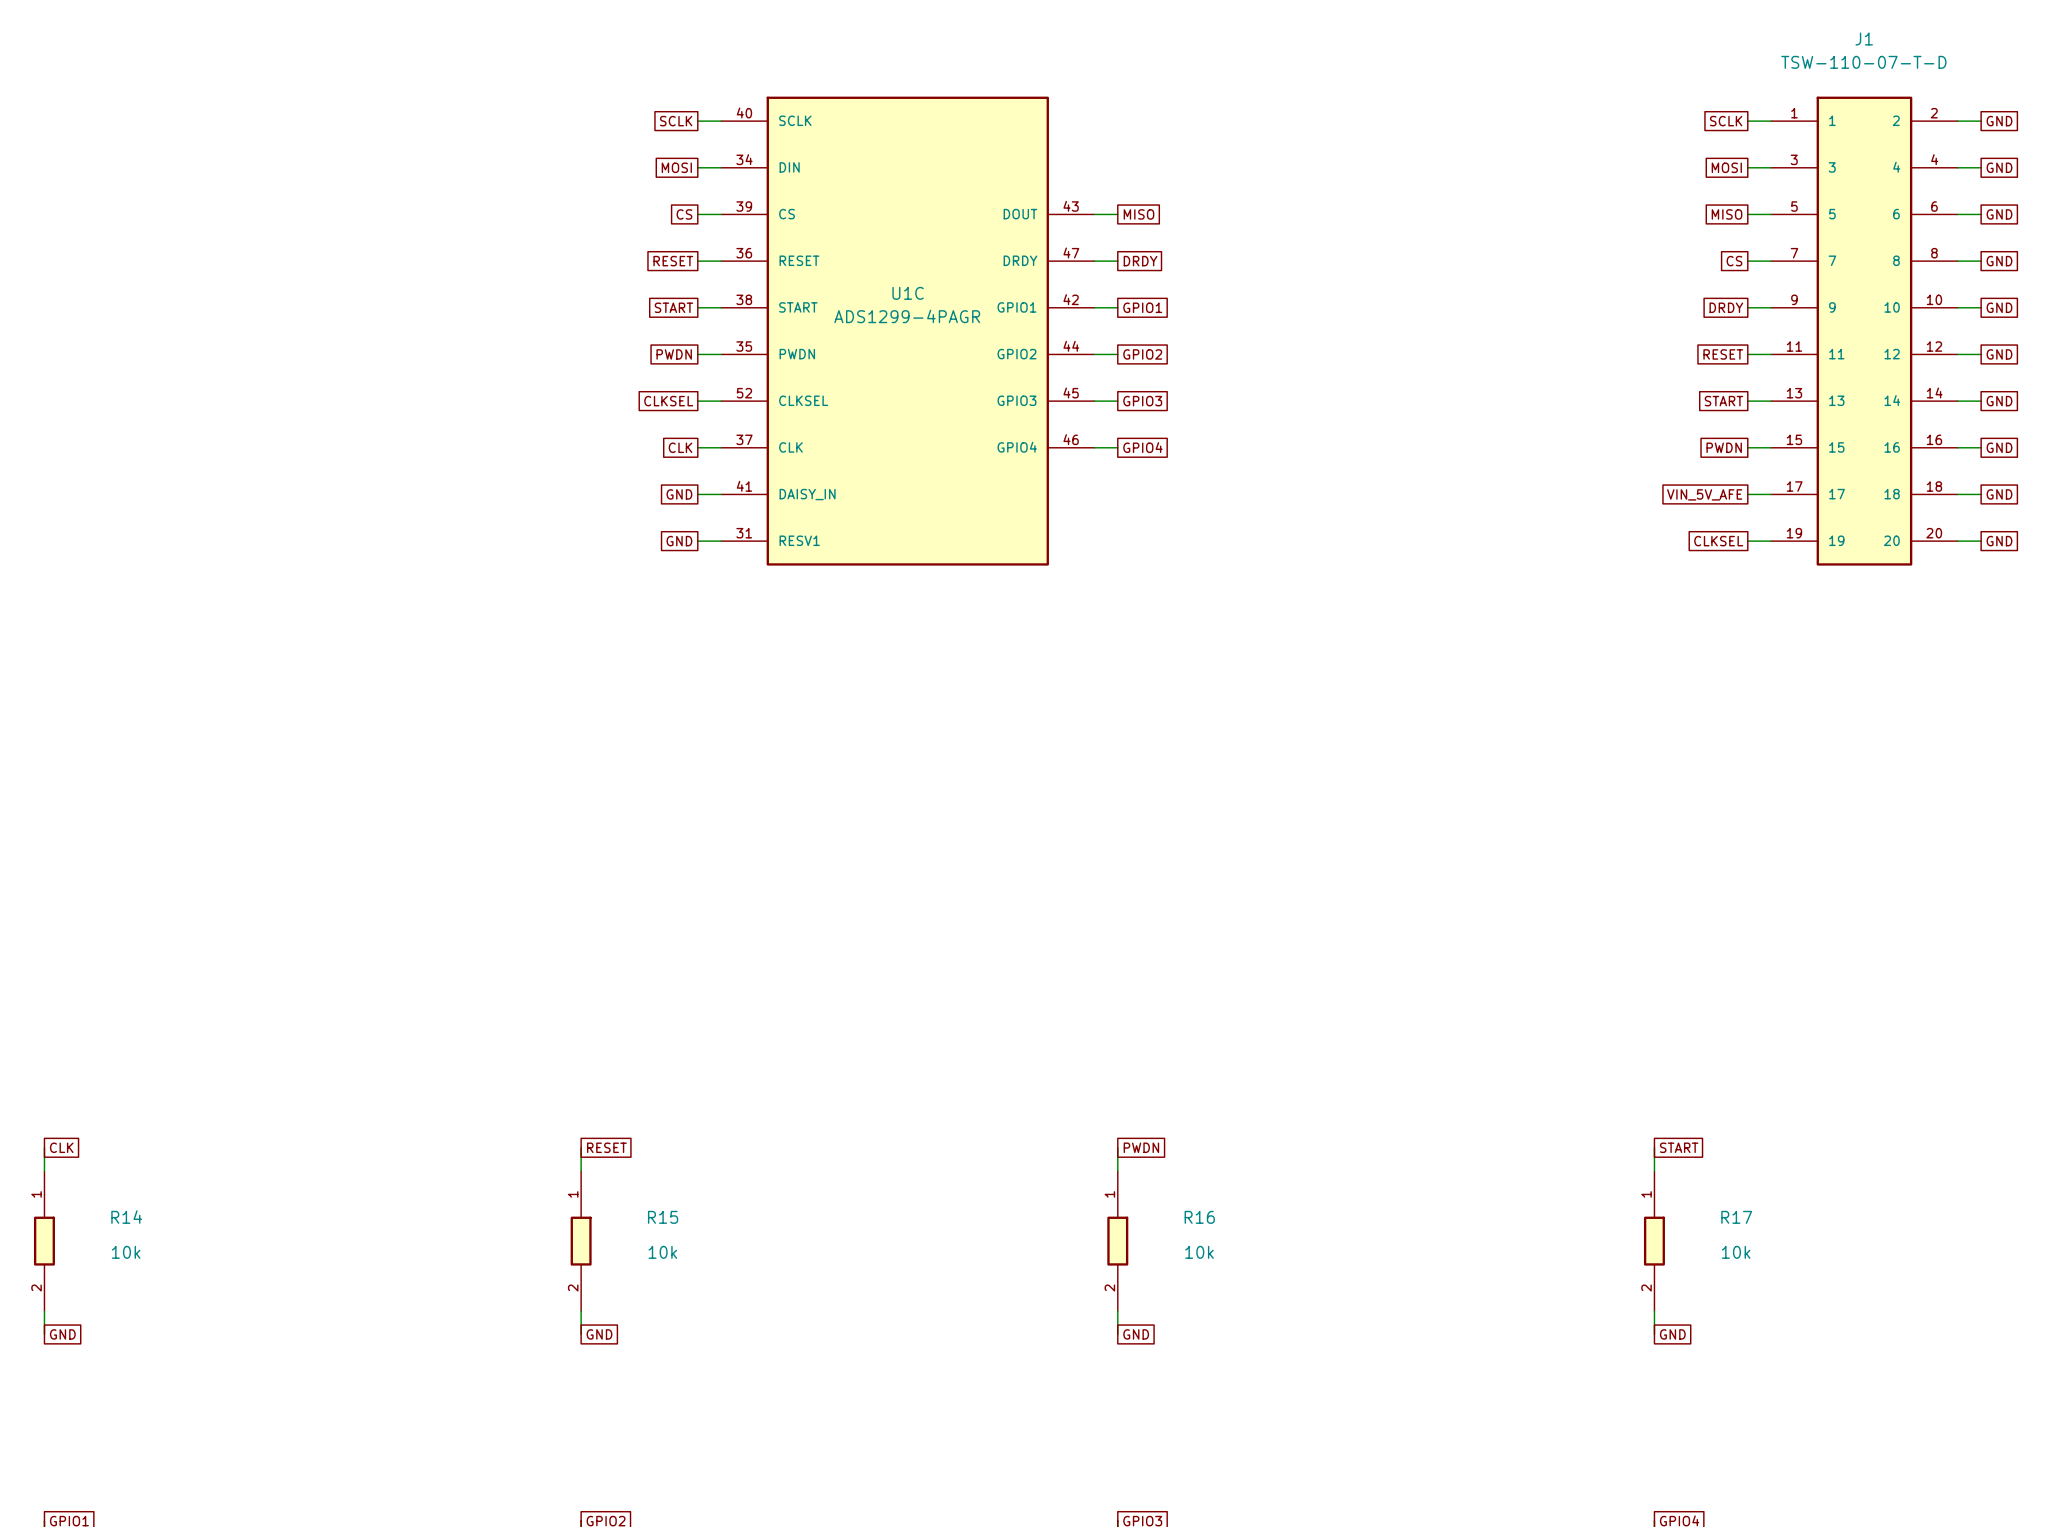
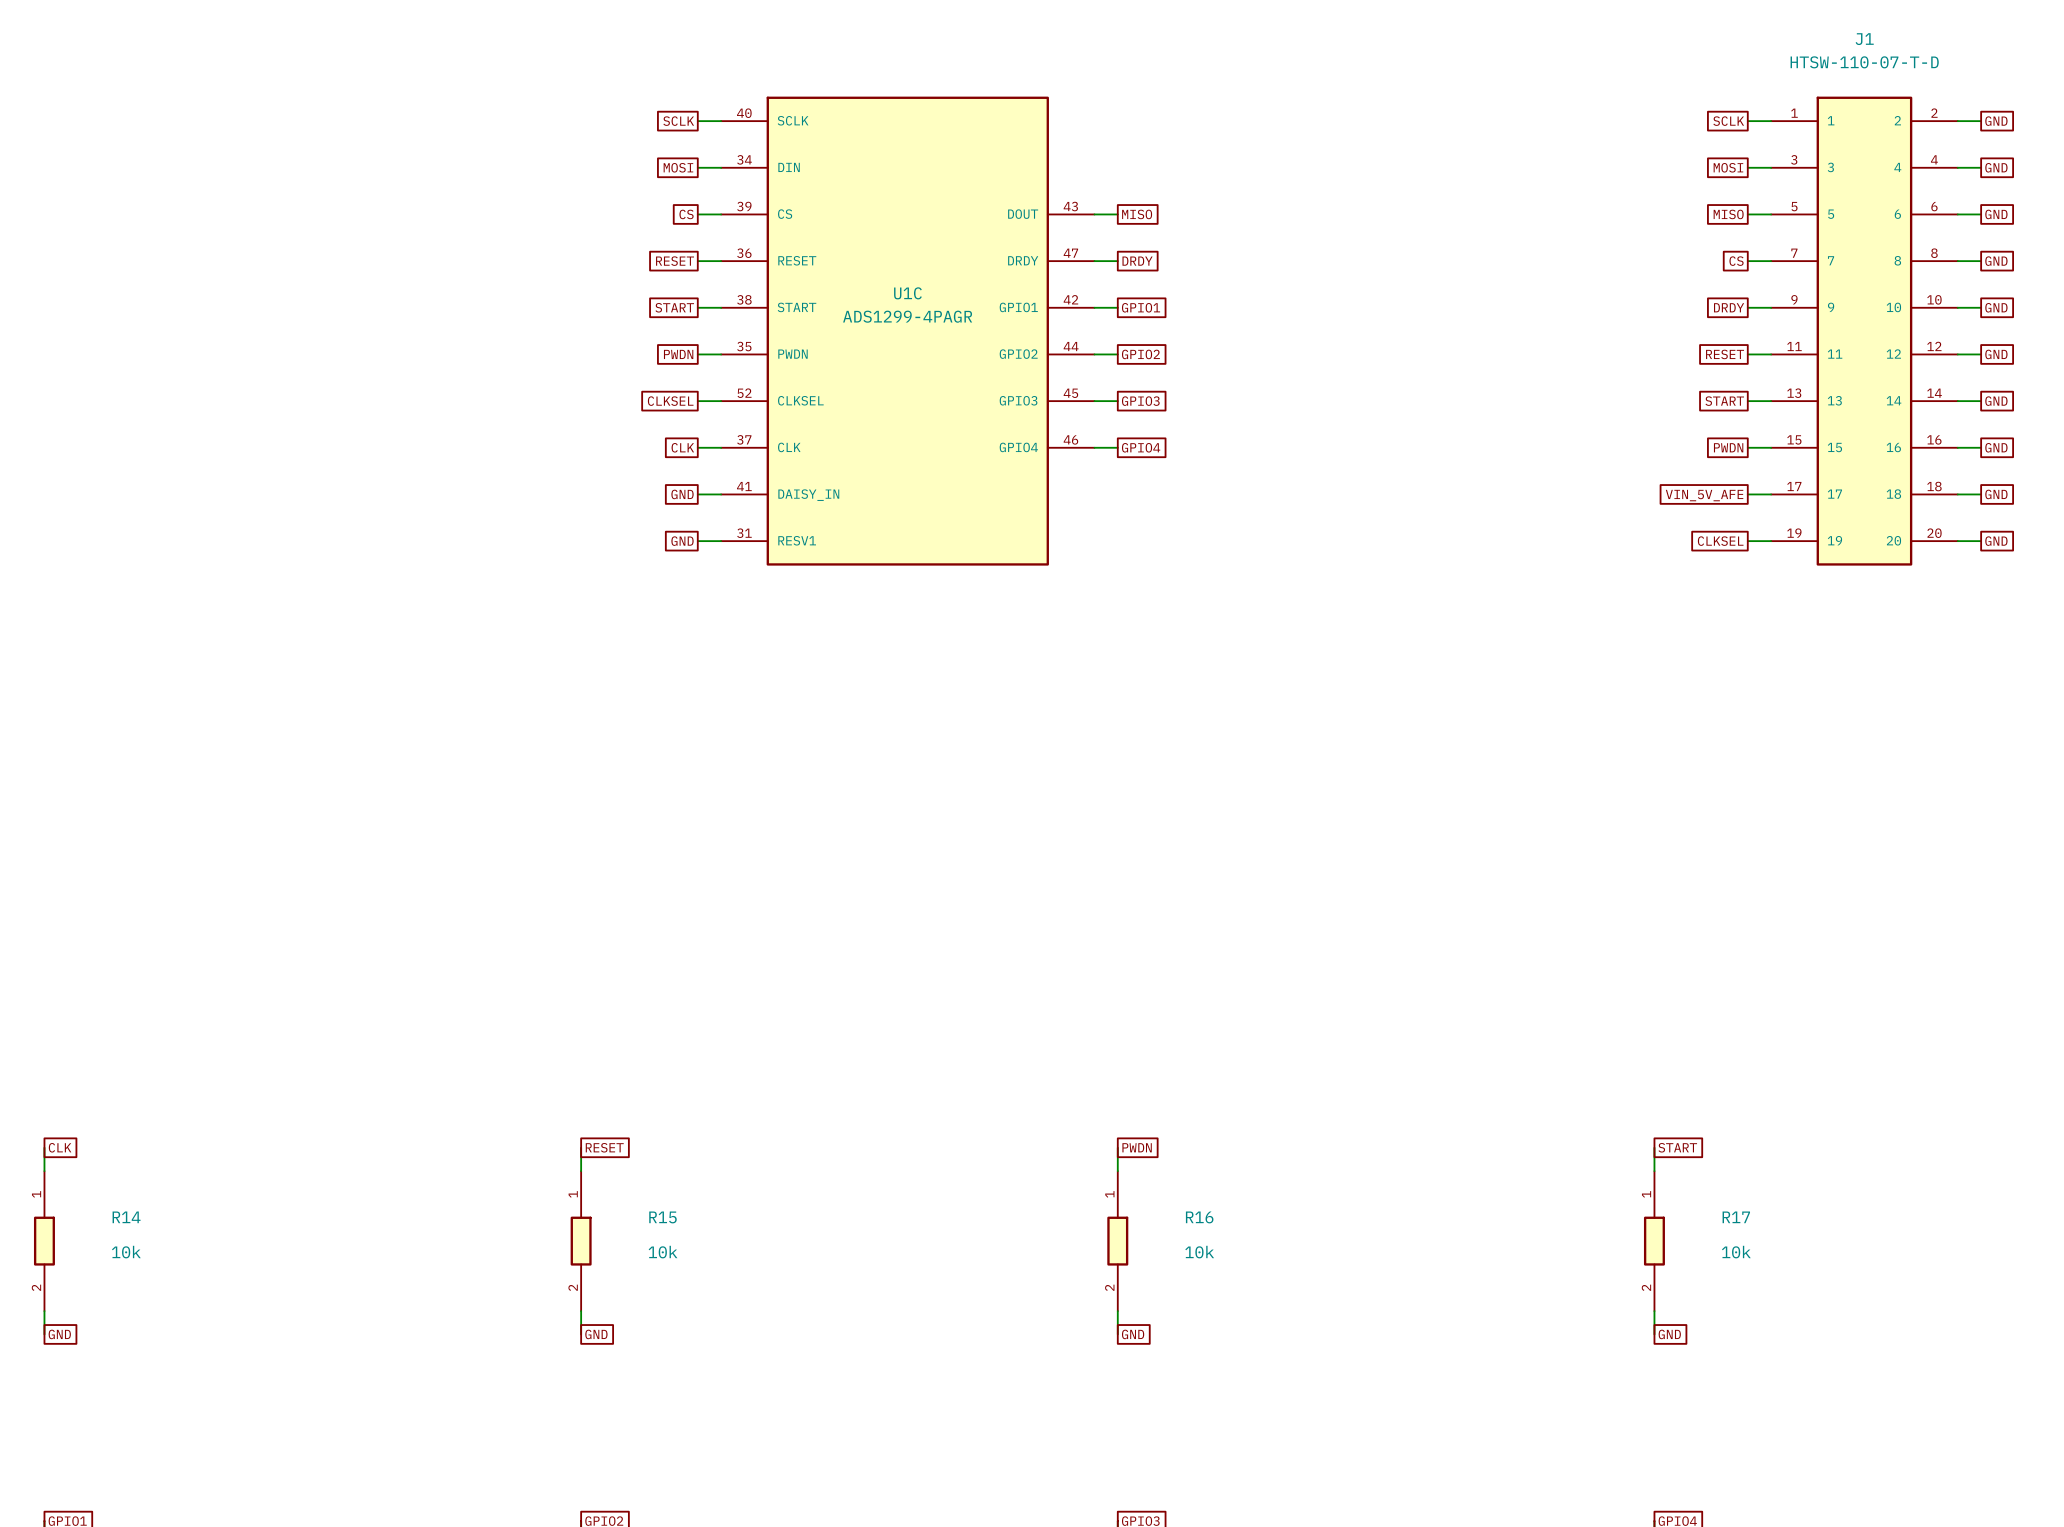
J1 value: TSW-110-07-T-D (1863, 62) -> HTSW-110-07-T-D (1864, 62)

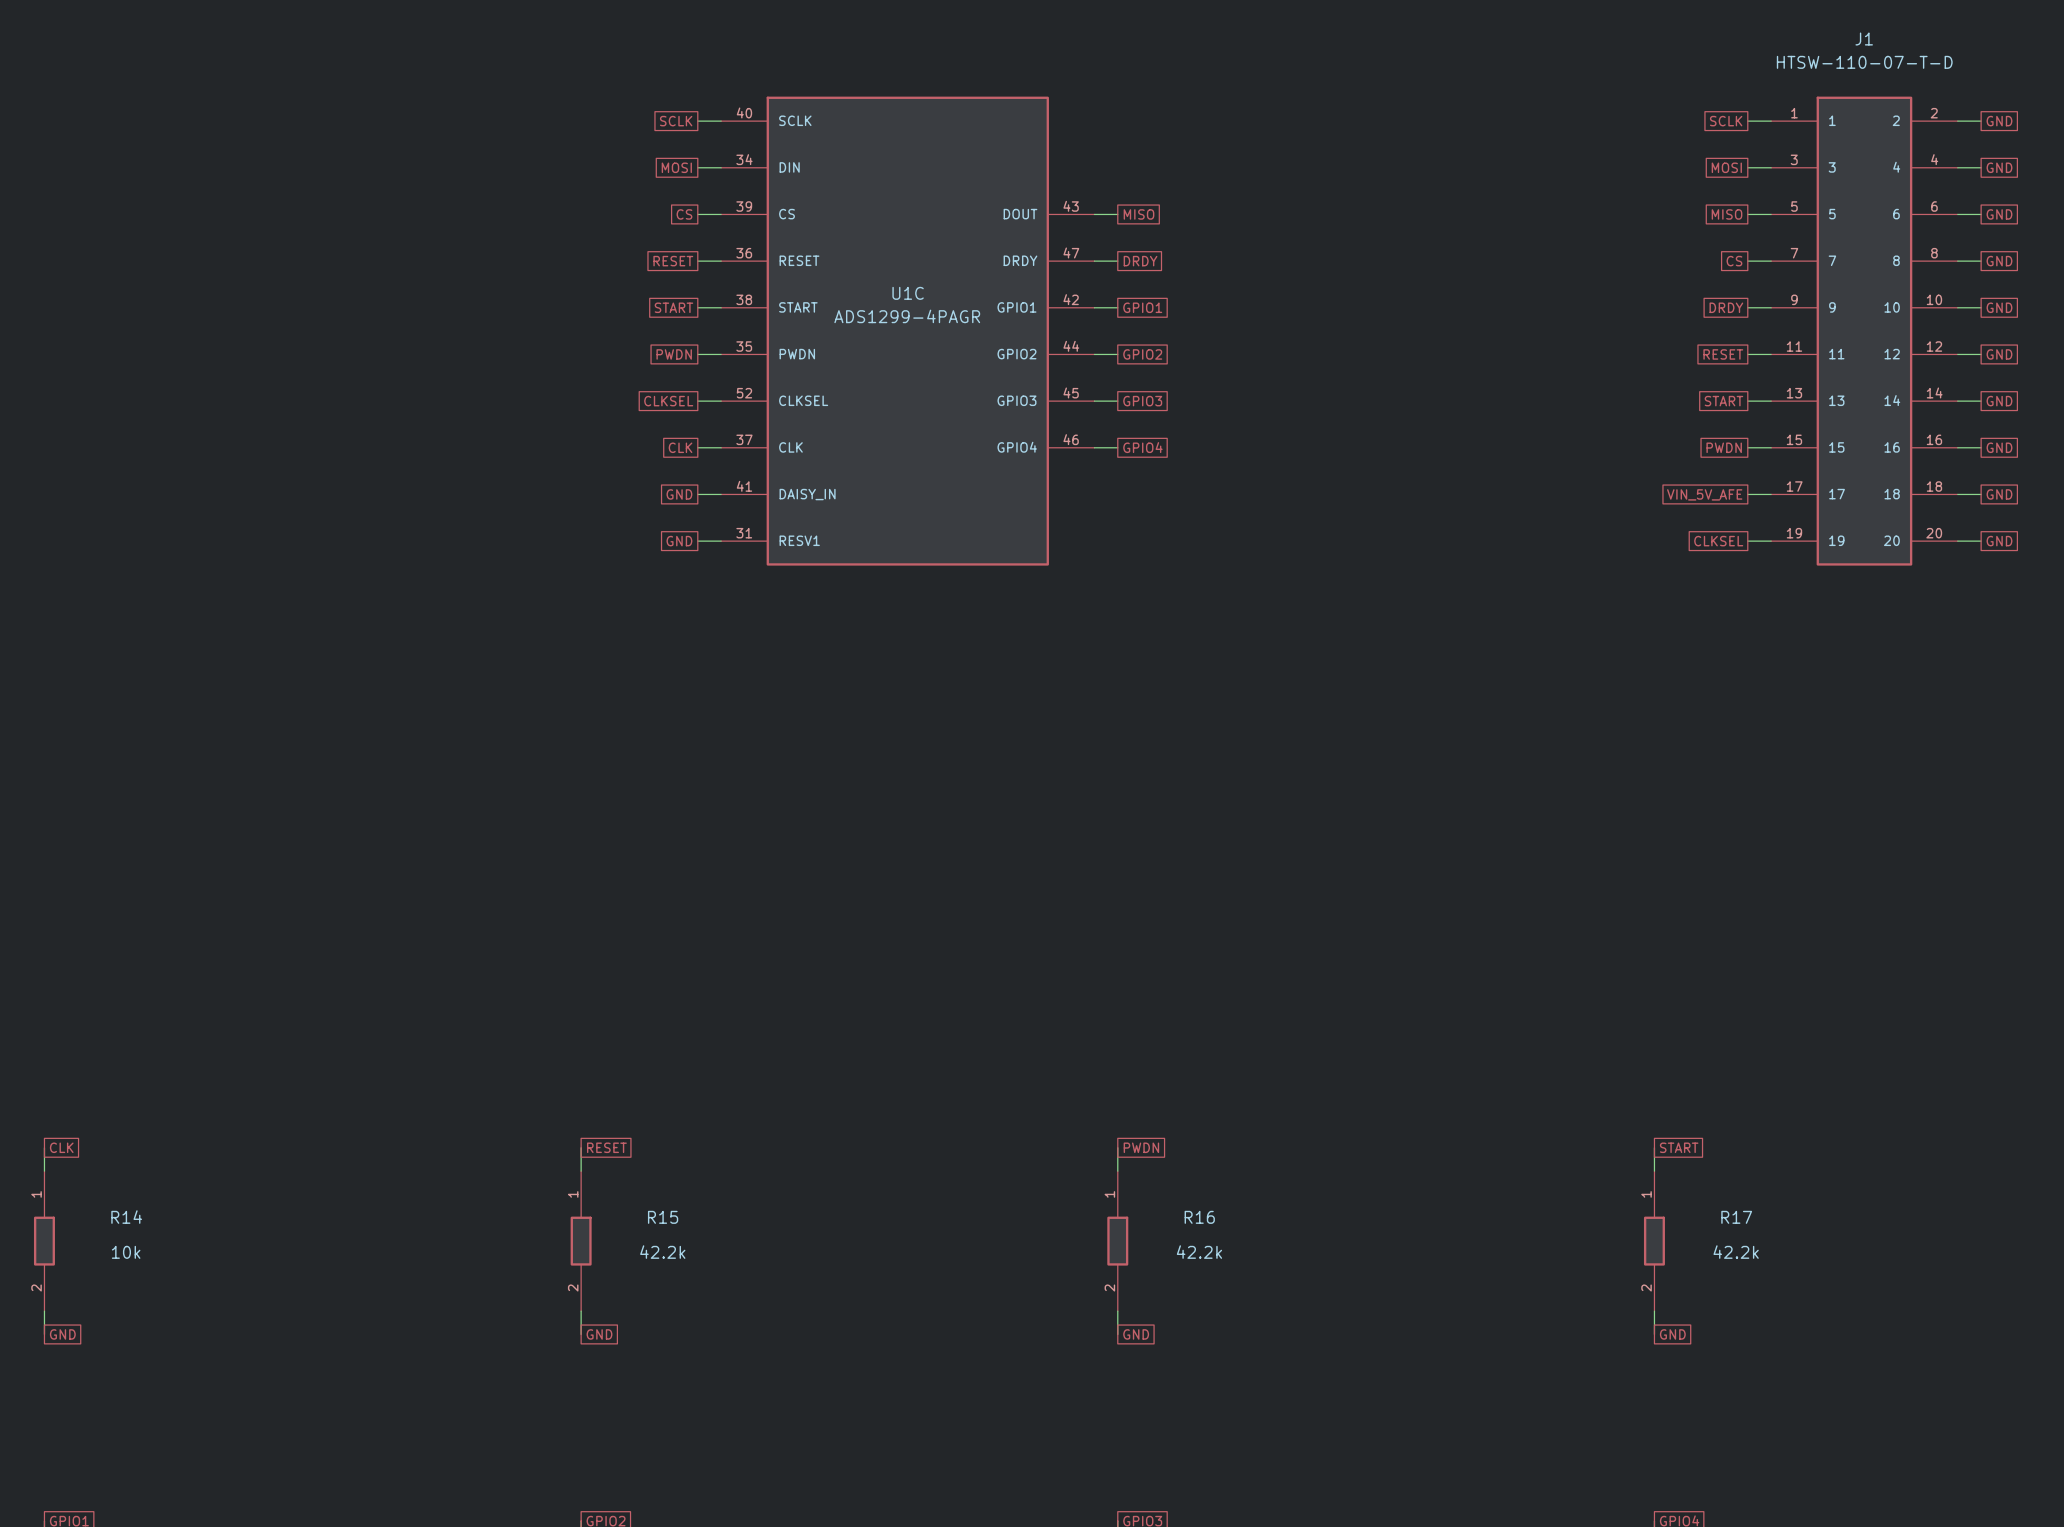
R15 value: 10k (663, 1252) -> 42.2k (662, 1252)
R16 value: 10k (1199, 1252) -> 42.2k (1199, 1252)
R17 value: 10k (1736, 1252) -> 42.2k (1736, 1252)

